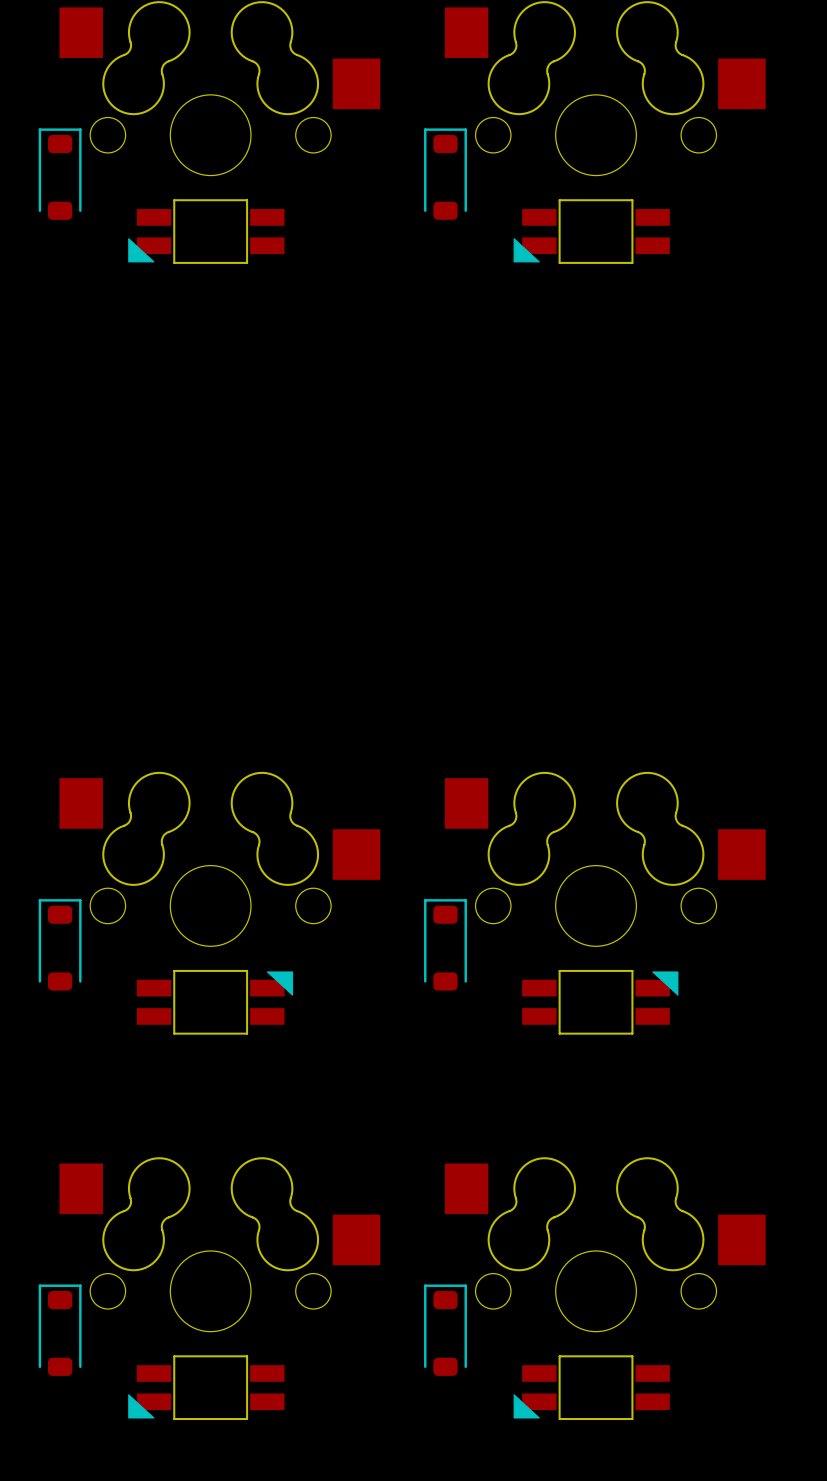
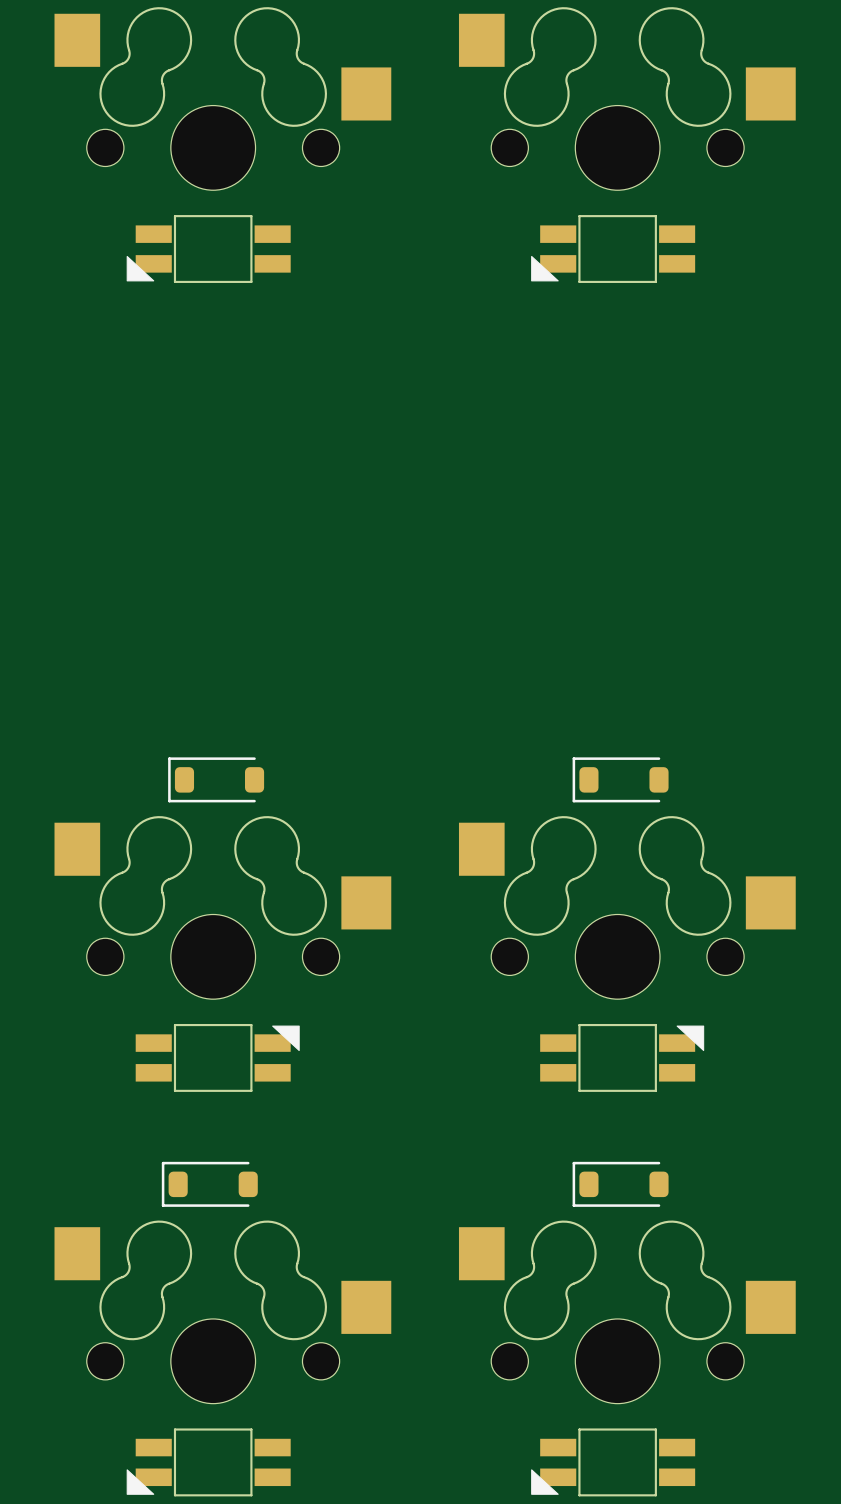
part: (60, 174) -> none
part: (445, 174) -> none
part: none -> (216, 779)
part: none -> (620, 779)
part: (60, 944) -> none
part: (445, 944) -> none
part: none -> (209, 1184)
part: none -> (620, 1184)
part: (60, 1330) -> none
part: (445, 1330) -> none

